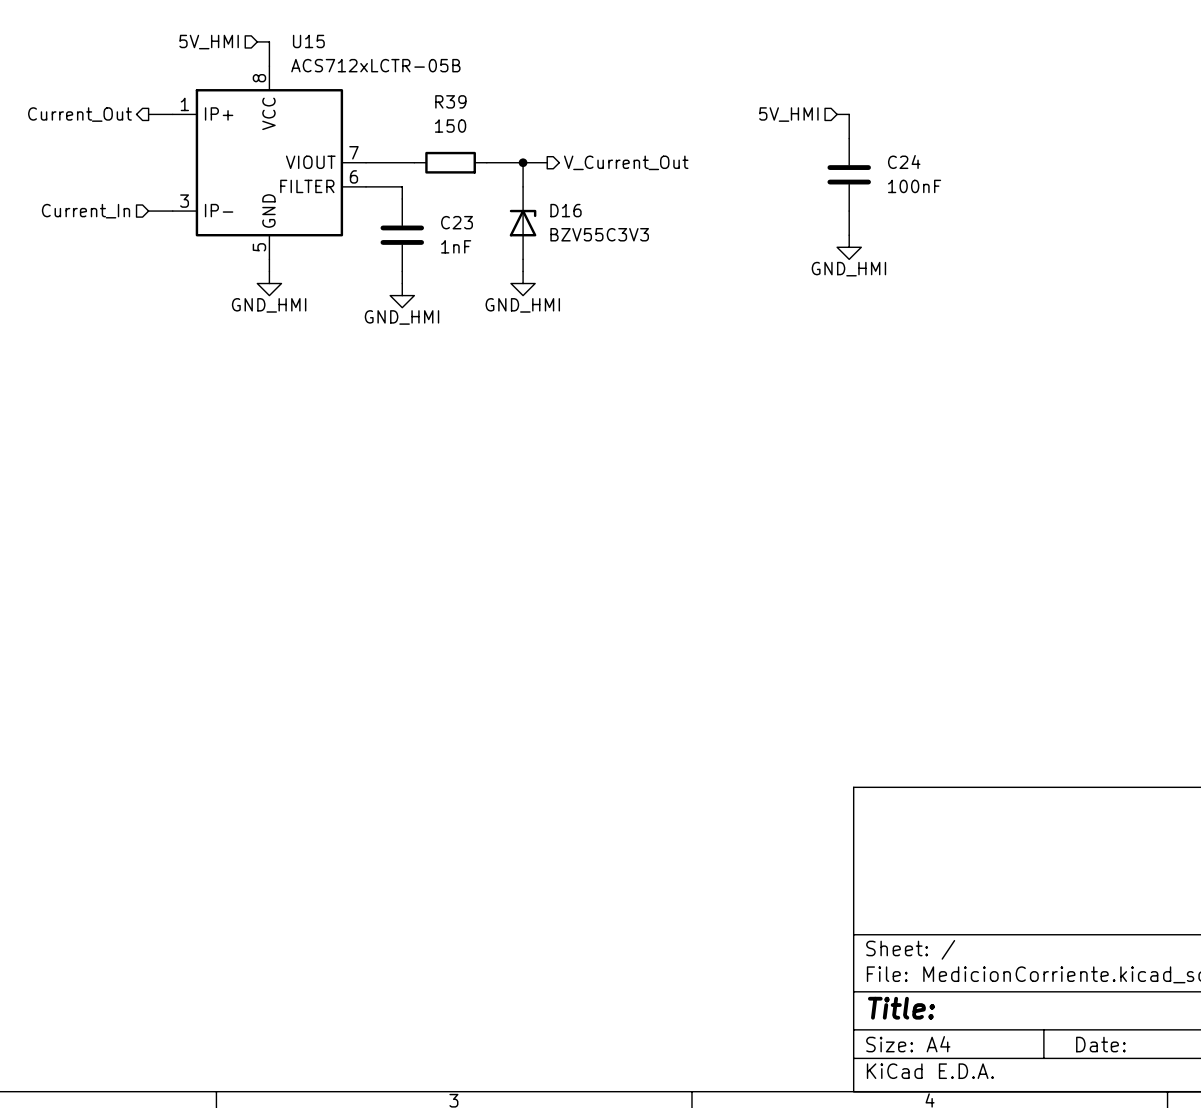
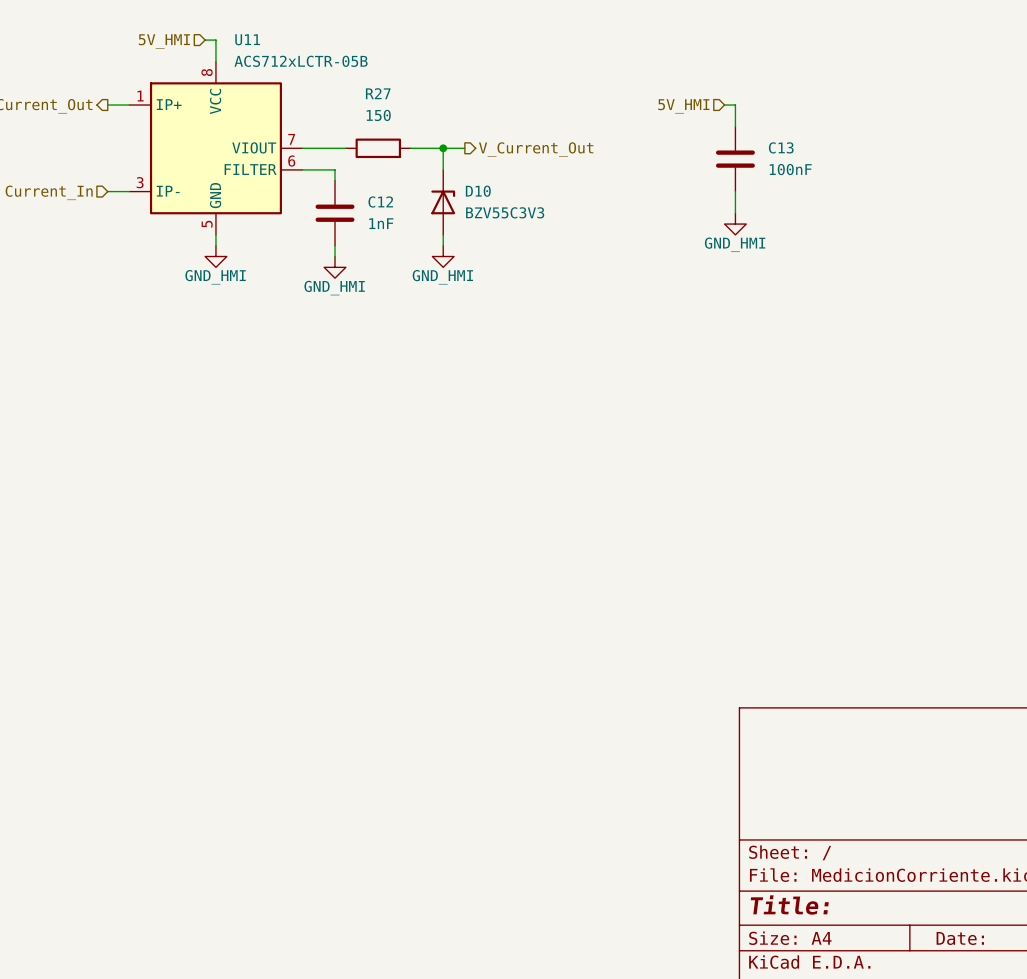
U15 name: U15 (308, 41) -> U11 (247, 39)
R39 name: R39 (450, 101) -> R27 (378, 93)
C24 name: C24 (904, 161) -> C13 (781, 147)
D16 name: D16 (566, 210) -> D10 (478, 191)
C23 name: C23 (457, 222) -> C12 (380, 202)

